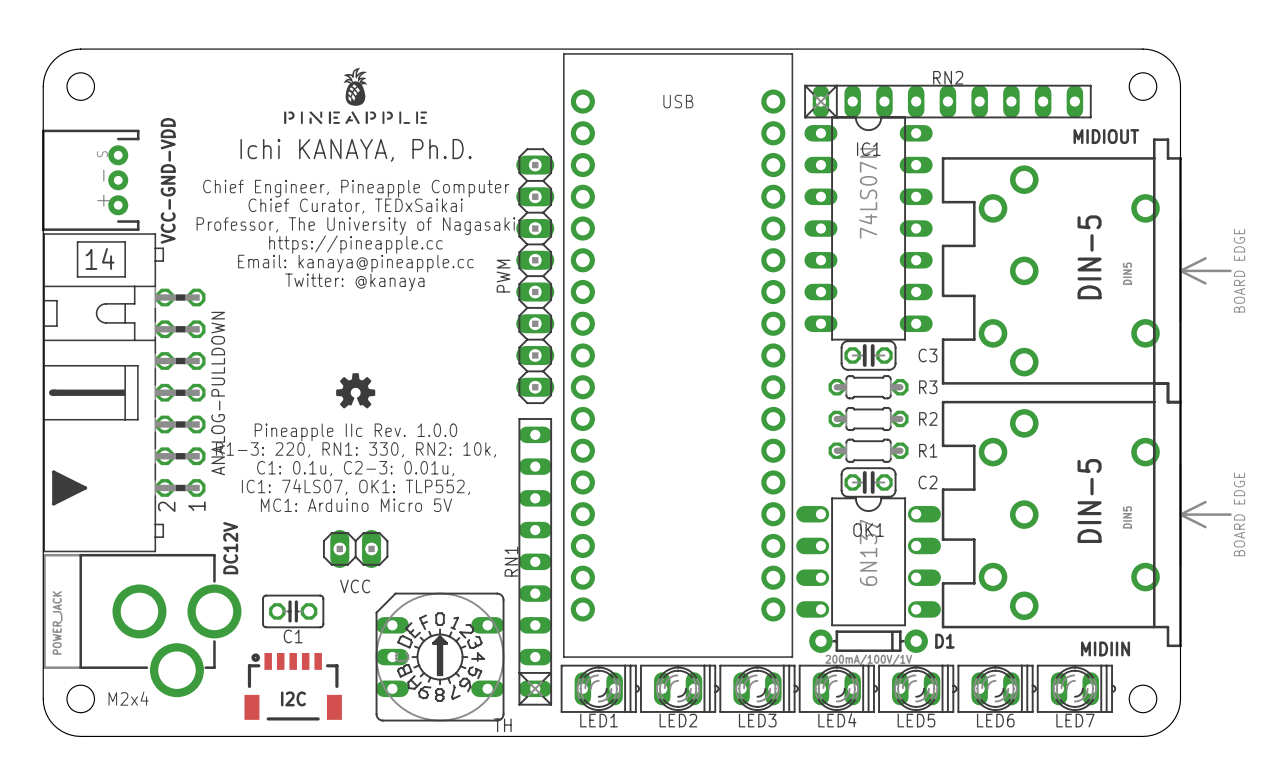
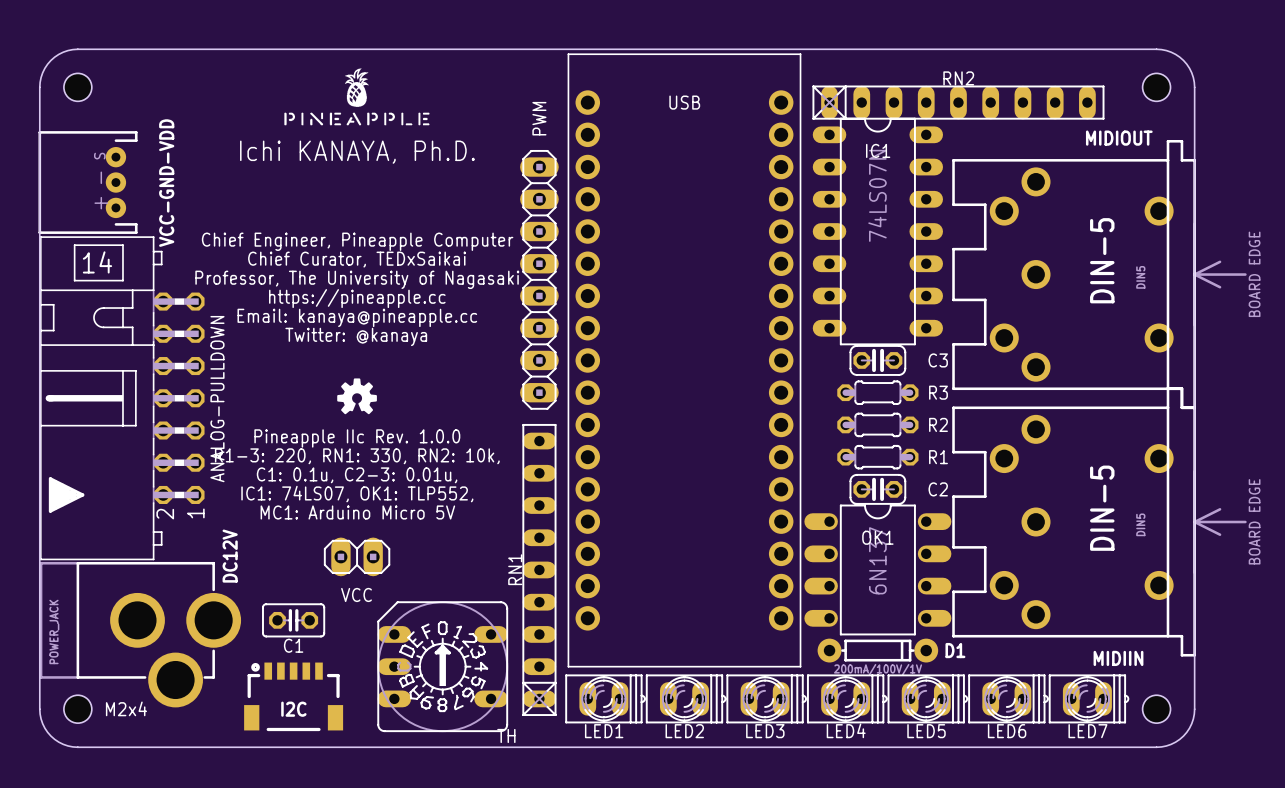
text position: Chief Engineer, Pineapple Computer (356, 188) -> Chief Engineer, Pineapple Computer (357, 241)
text position: Chief Curator, TEDxSaikai (355, 206) -> Chief Curator, TEDxSaikai (357, 259)
text position: Professor, The University of Nagasaki (355, 226) -> Professor, The University of Nagasaki (357, 279)
text position: https://pineapple.cc (355, 244) -> https://pineapple.cc (357, 298)
text position: Email: kanaya@pineapple.cc (355, 263) -> Email: kanaya@pineapple.cc (357, 317)
PWM name position: PWM (503, 276) -> PWM (539, 118)
text position: Twitter: @kanaya (354, 282) -> Twitter: @kanaya (356, 336)

